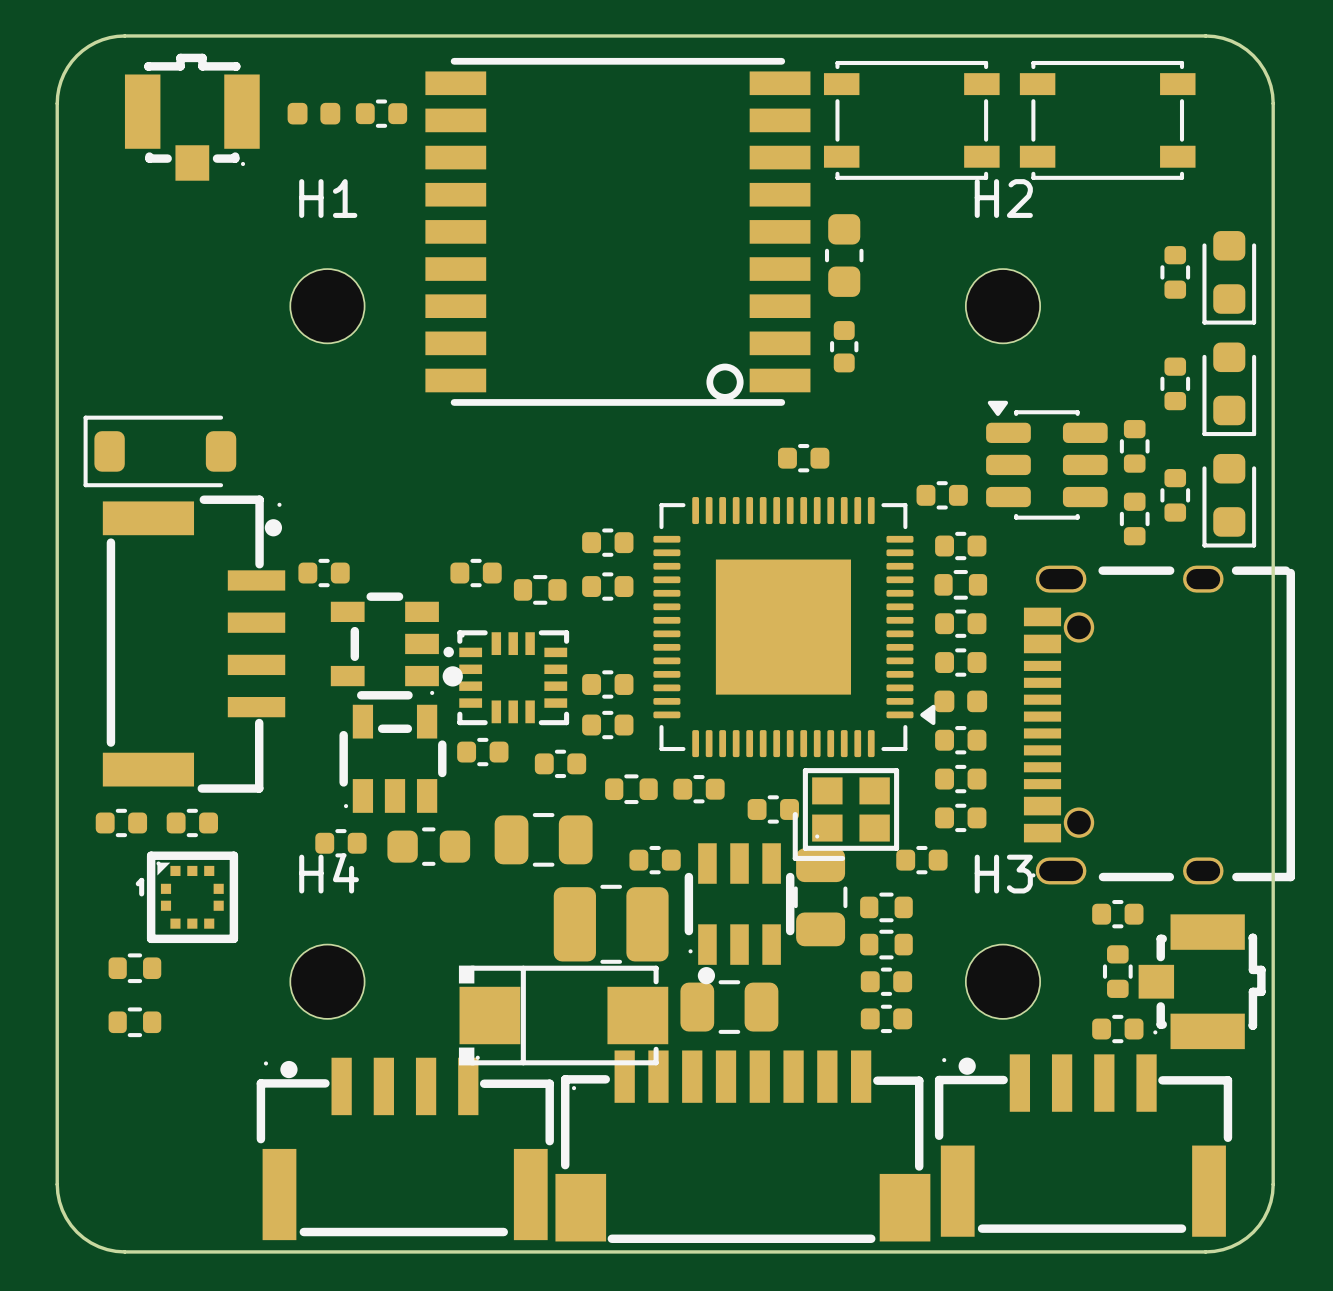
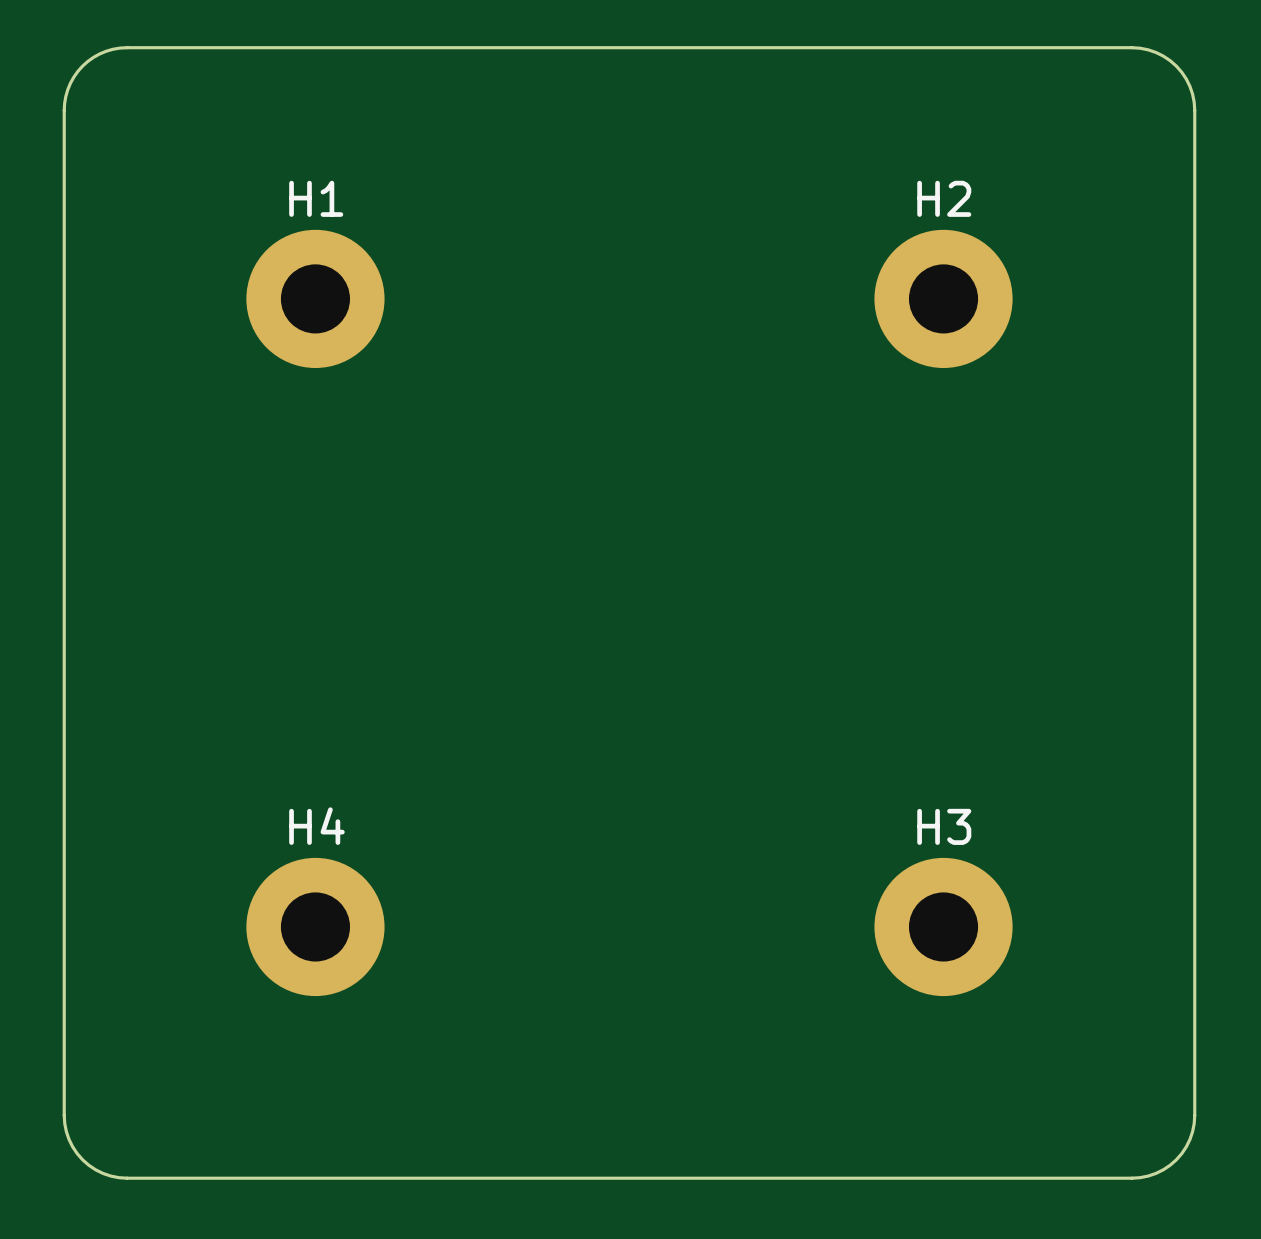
part: (313, 113) -> none
part: (381, 113) -> none
part: (192, 117) -> none
part: (911, 120) -> none
part: (1107, 120) -> none
part: (617, 231) -> none
part: (844, 255) -> none
H1 footprint: [290, 269, 365, 344] -> [246, 229, 385, 369]
H2 footprint: [965, 269, 1041, 344] -> [874, 229, 1013, 369]
part: (1175, 272) -> none
part: (1229, 277) -> none
part: (844, 346) -> none
part: (1175, 383) -> none
part: (1229, 389) -> none
part: (1134, 446) -> none
part: (159, 451) -> none
part: (803, 458) -> none
part: (1046, 460) -> none
part: (942, 495) -> none
part: (1175, 495) -> none
part: (1229, 500) -> none
part: (1134, 518) -> none
part: (607, 542) -> none
part: (960, 546) -> none
part: (324, 573) -> none
part: (476, 573) -> none
part: (960, 584) -> none
part: (607, 586) -> none
part: (540, 589) -> none
part: (960, 623) -> none
part: (794, 627) -> none
part: (194, 644) -> none
part: (396, 645) -> none
part: (960, 662) -> none
part: (506, 677) -> none
part: (607, 684) -> none
part: (960, 701) -> none
part: (607, 725) -> none
part: (1159, 725) -> none
part: (960, 740) -> none
part: (482, 752) -> none
part: (392, 758) -> none
part: (560, 763) -> none
part: (960, 779) -> none
part: (631, 789) -> none
part: (698, 789) -> none
part: (773, 809) -> none
part: (845, 814) -> none
part: (960, 817) -> none
part: (121, 822) -> none
part: (192, 822) -> none
part: (543, 839) -> none
part: (340, 843) -> none
part: (428, 846) -> none
part: (655, 860) -> none
part: (921, 860) -> none
part: (186, 897) -> none
part: (820, 897) -> none
part: (886, 907) -> none
part: (739, 913) -> none
part: (1117, 914) -> none
part: (611, 924) -> none
H4 footprint: [290, 944, 365, 1019] -> [246, 857, 385, 997]
part: (886, 944) -> none
H3 footprint: [965, 944, 1041, 1019] -> [874, 857, 1013, 997]
part: (134, 968) -> none
part: (1117, 971) -> none
part: (886, 981) -> none
part: (1202, 981) -> none
part: (729, 1007) -> none
part: (563, 1015) -> none
part: (886, 1018) -> none
part: (134, 1022) -> none
part: (1117, 1029) -> none
part: (1083, 1145) -> none
part: (742, 1146) -> none
part: (405, 1148) -> none

